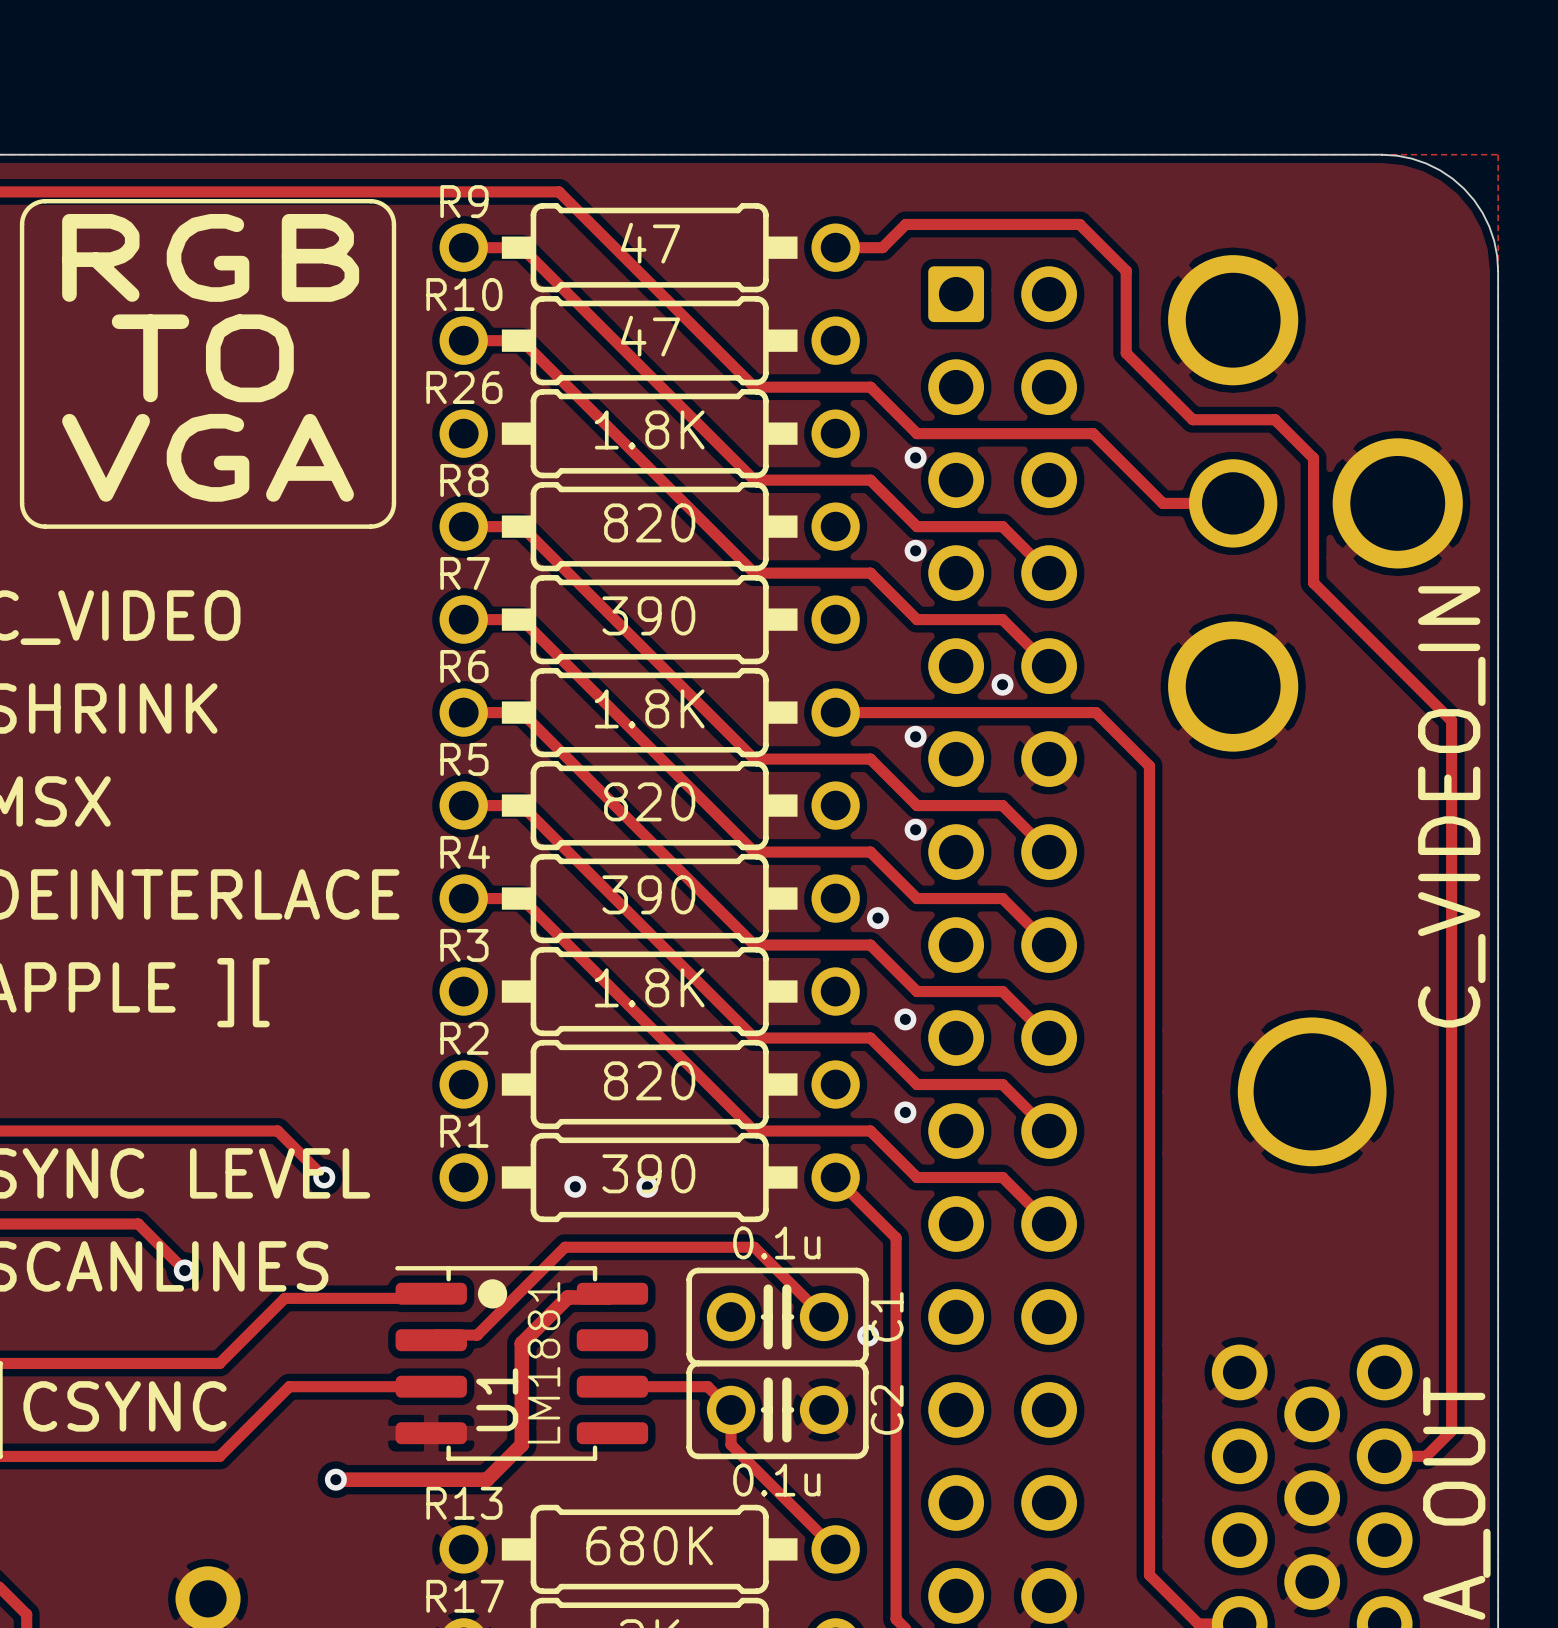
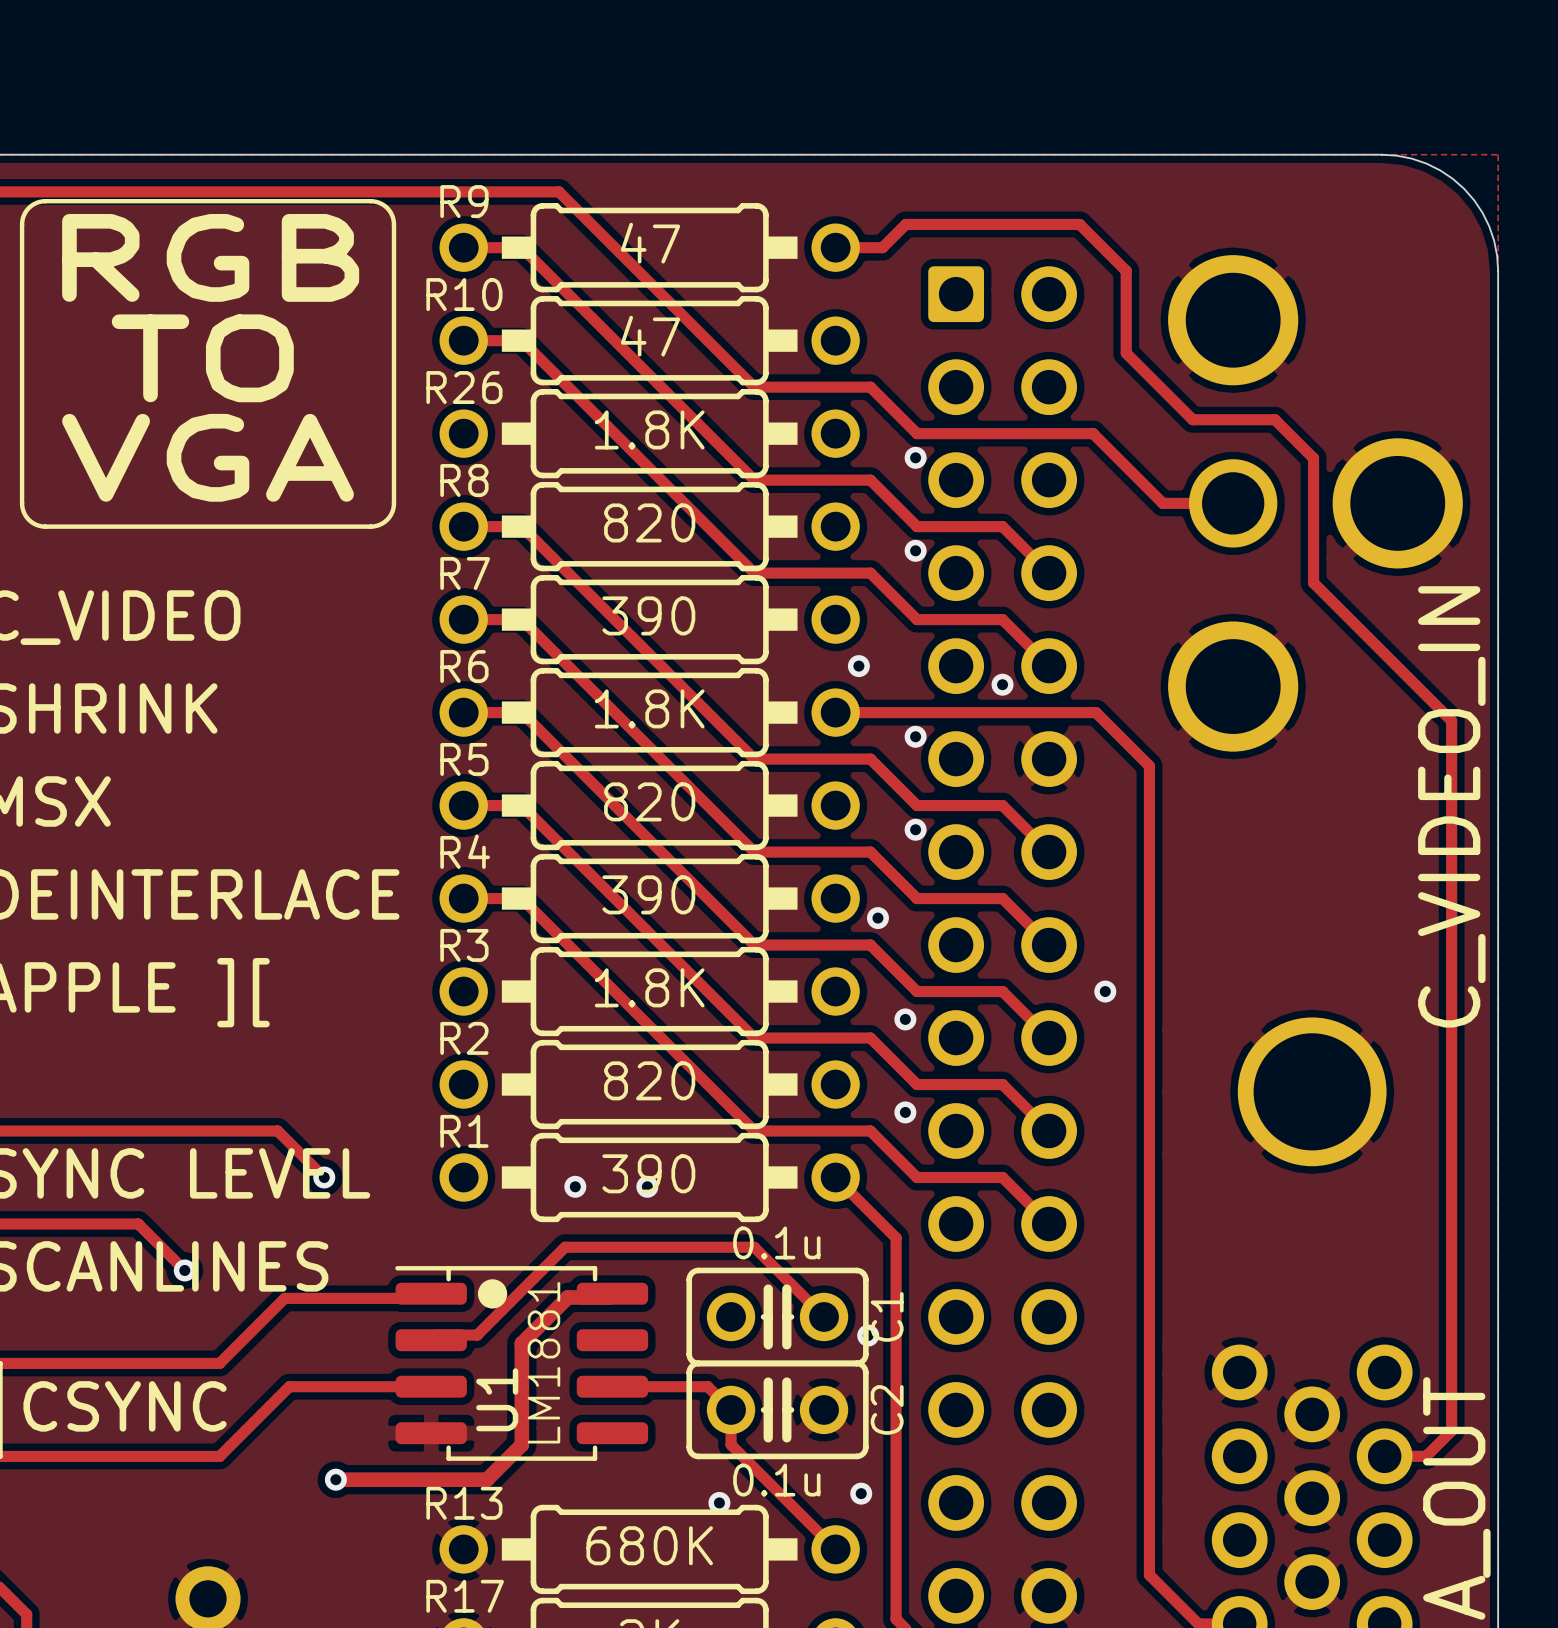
via: none -> (858, 666)
via: none -> (1105, 991)
via: none -> (861, 1493)
via: none -> (719, 1502)

